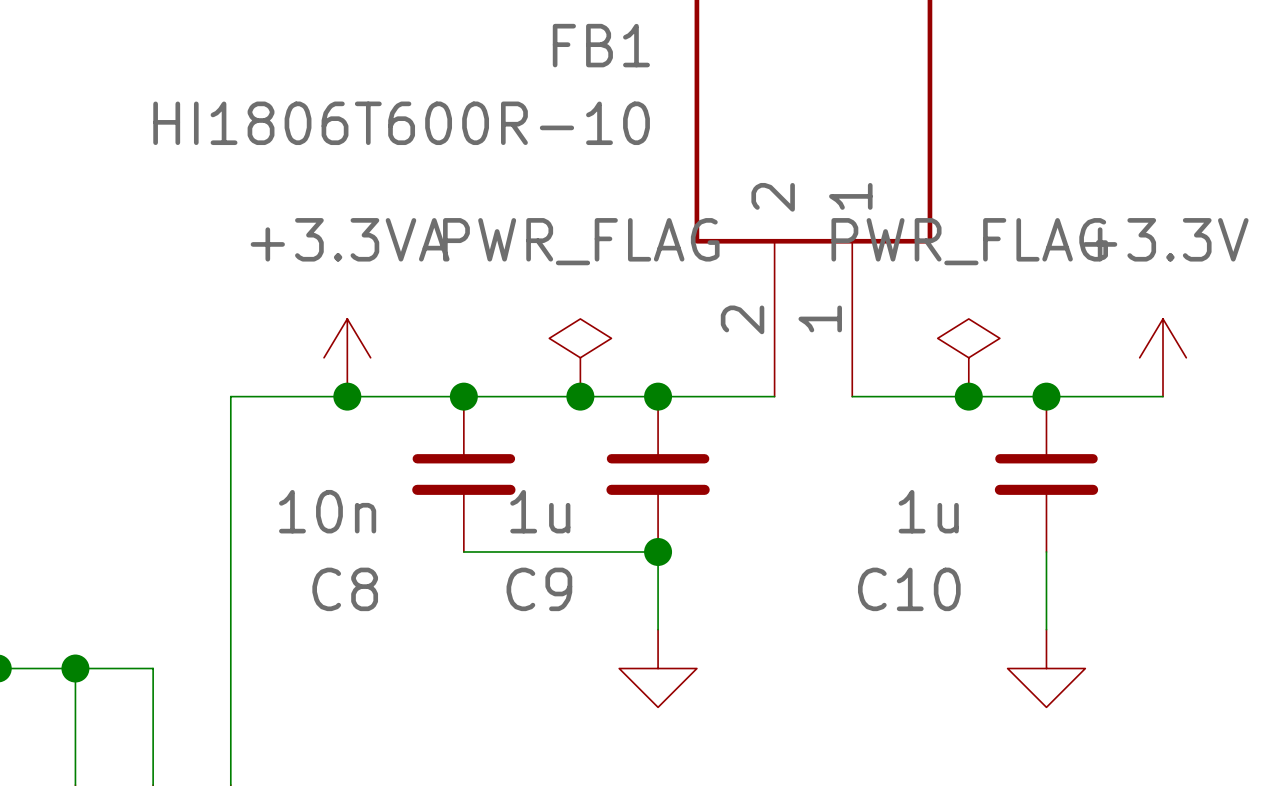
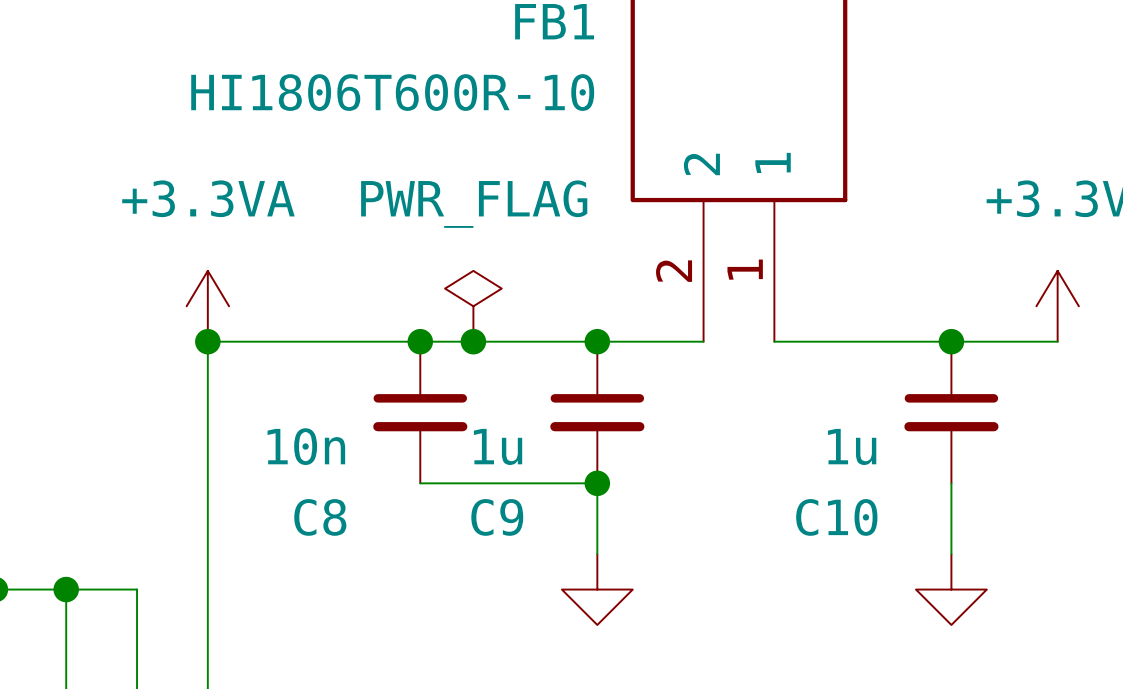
power symbol position: +3.3VA (347, 357) -> +3.3VA (207, 306)
power symbol position: PWR_FLAG (580, 357) -> PWR_FLAG (473, 306)
power symbol: PWR_FLAG (968, 357) -> none
junction: none -> (207, 341)
junction: (347, 396) -> none
junction position: (580, 396) -> (473, 341)
junction: (968, 396) -> none

